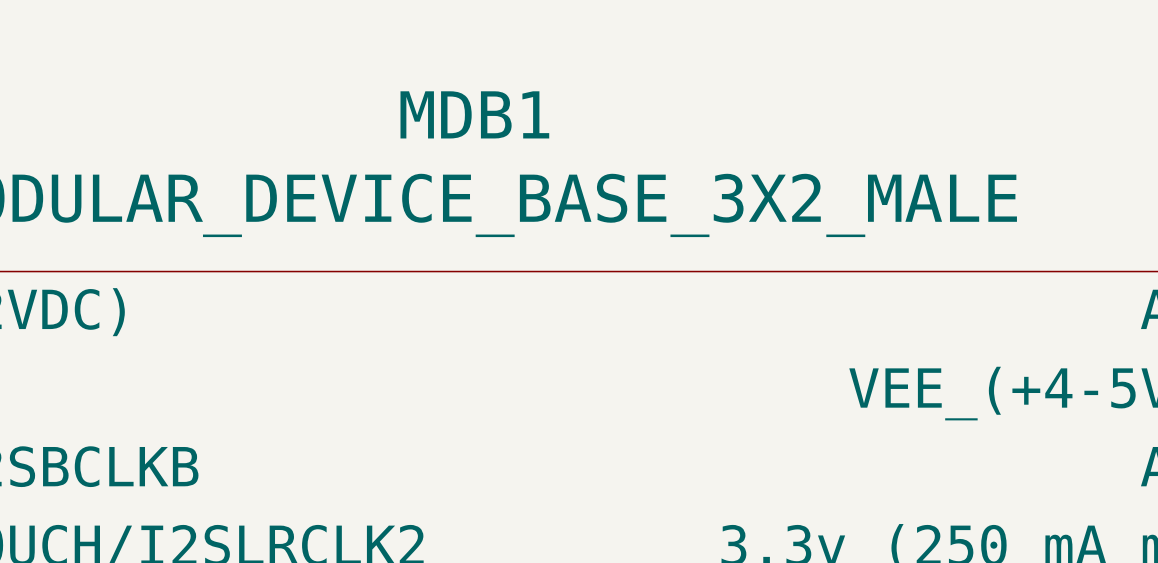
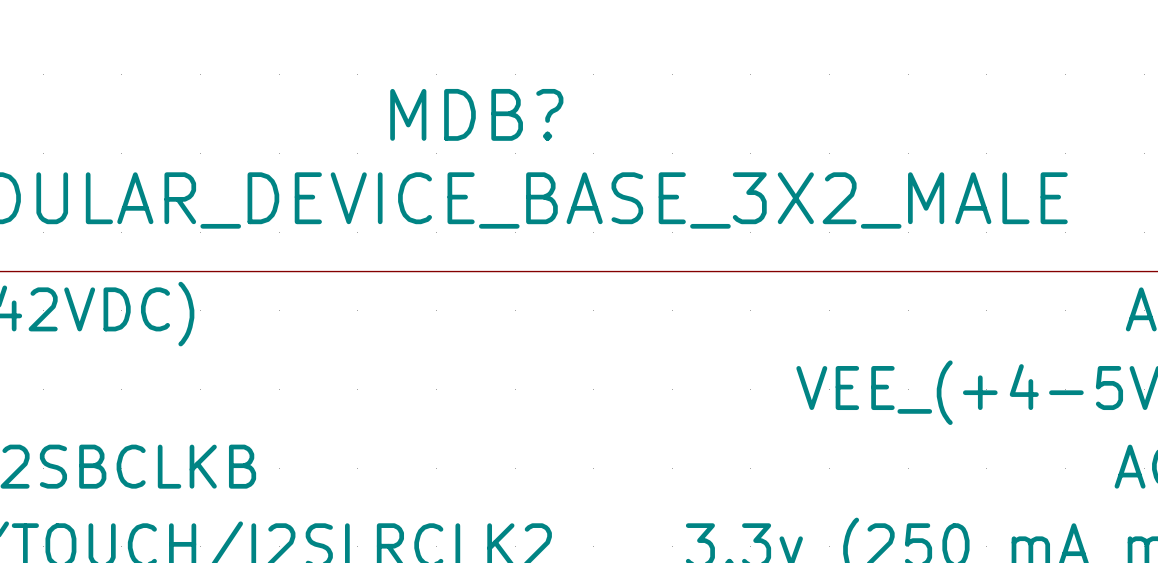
MDB1 name: MDB1 (474, 114) -> MDB? (476, 114)

